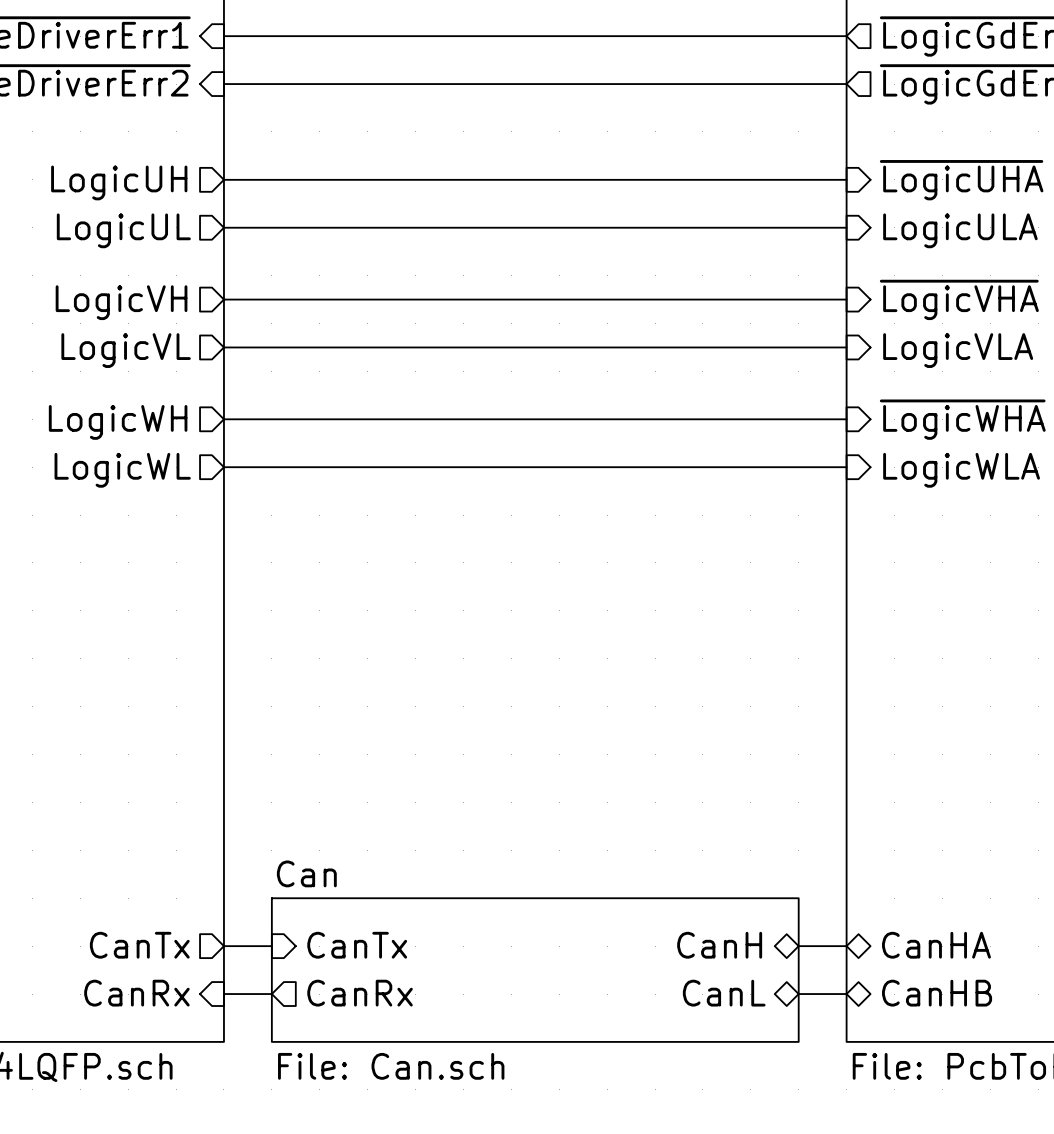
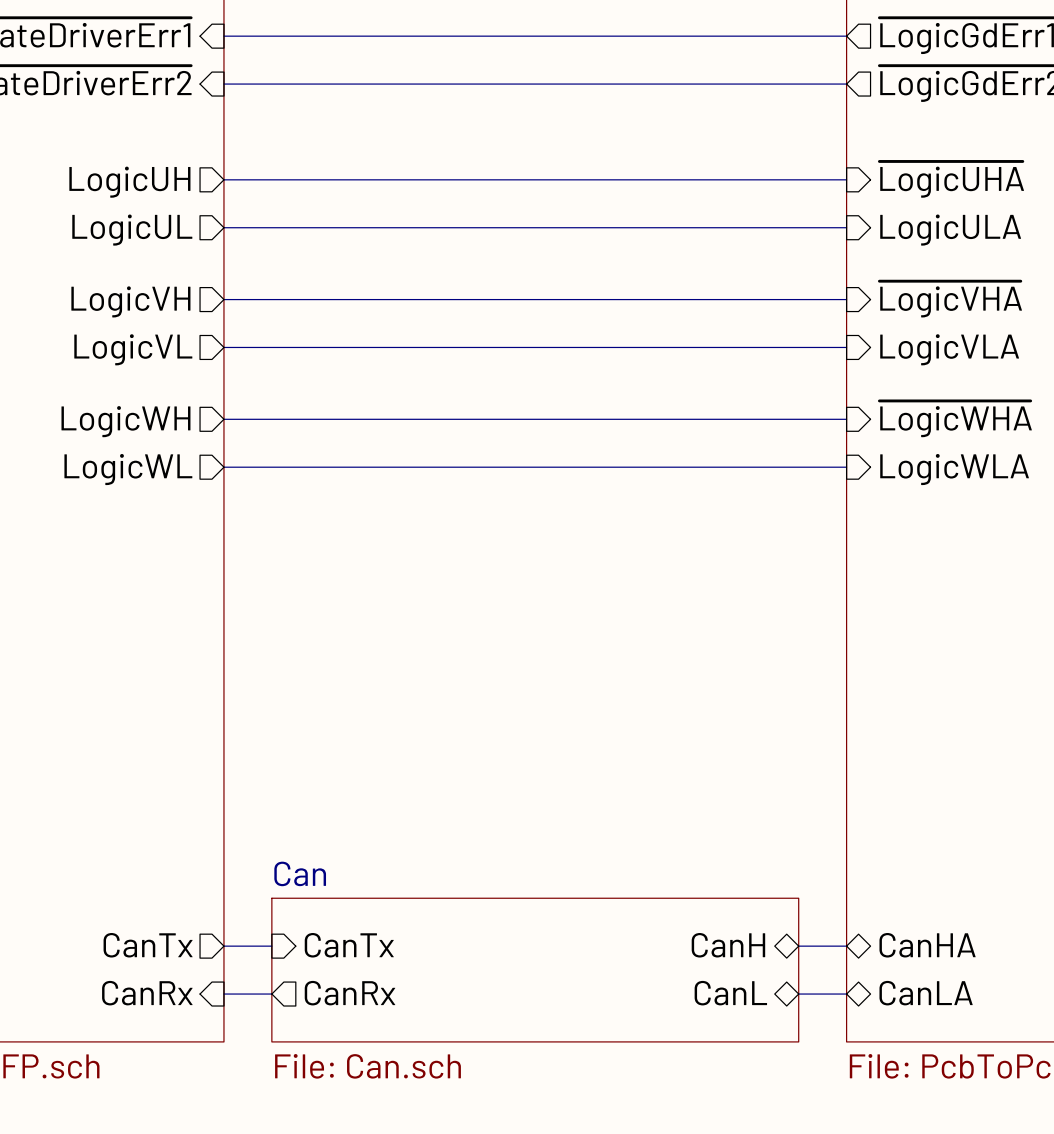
sheet pin: CanHB (937, 993) -> CanLA (926, 993)

